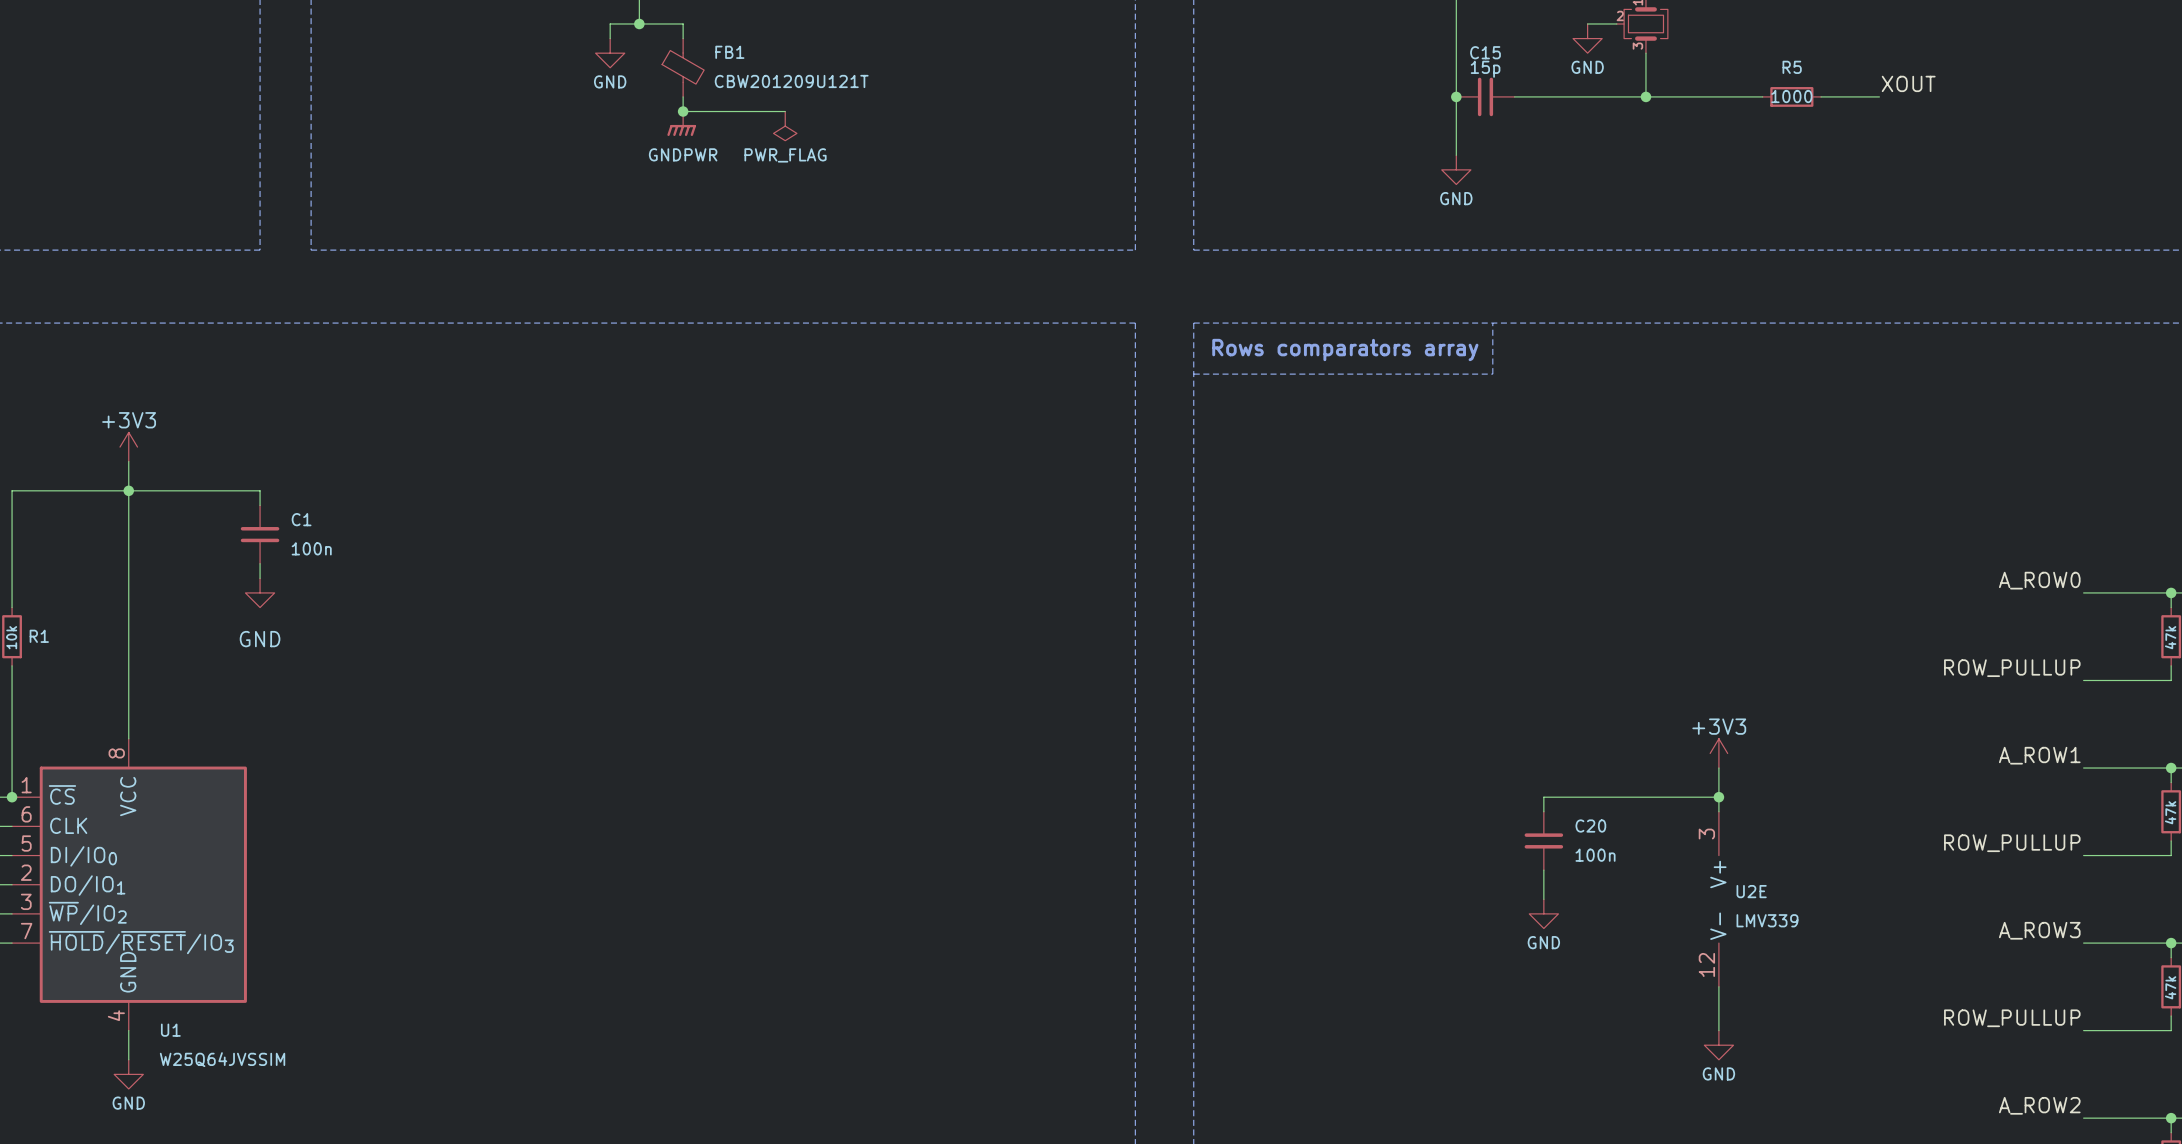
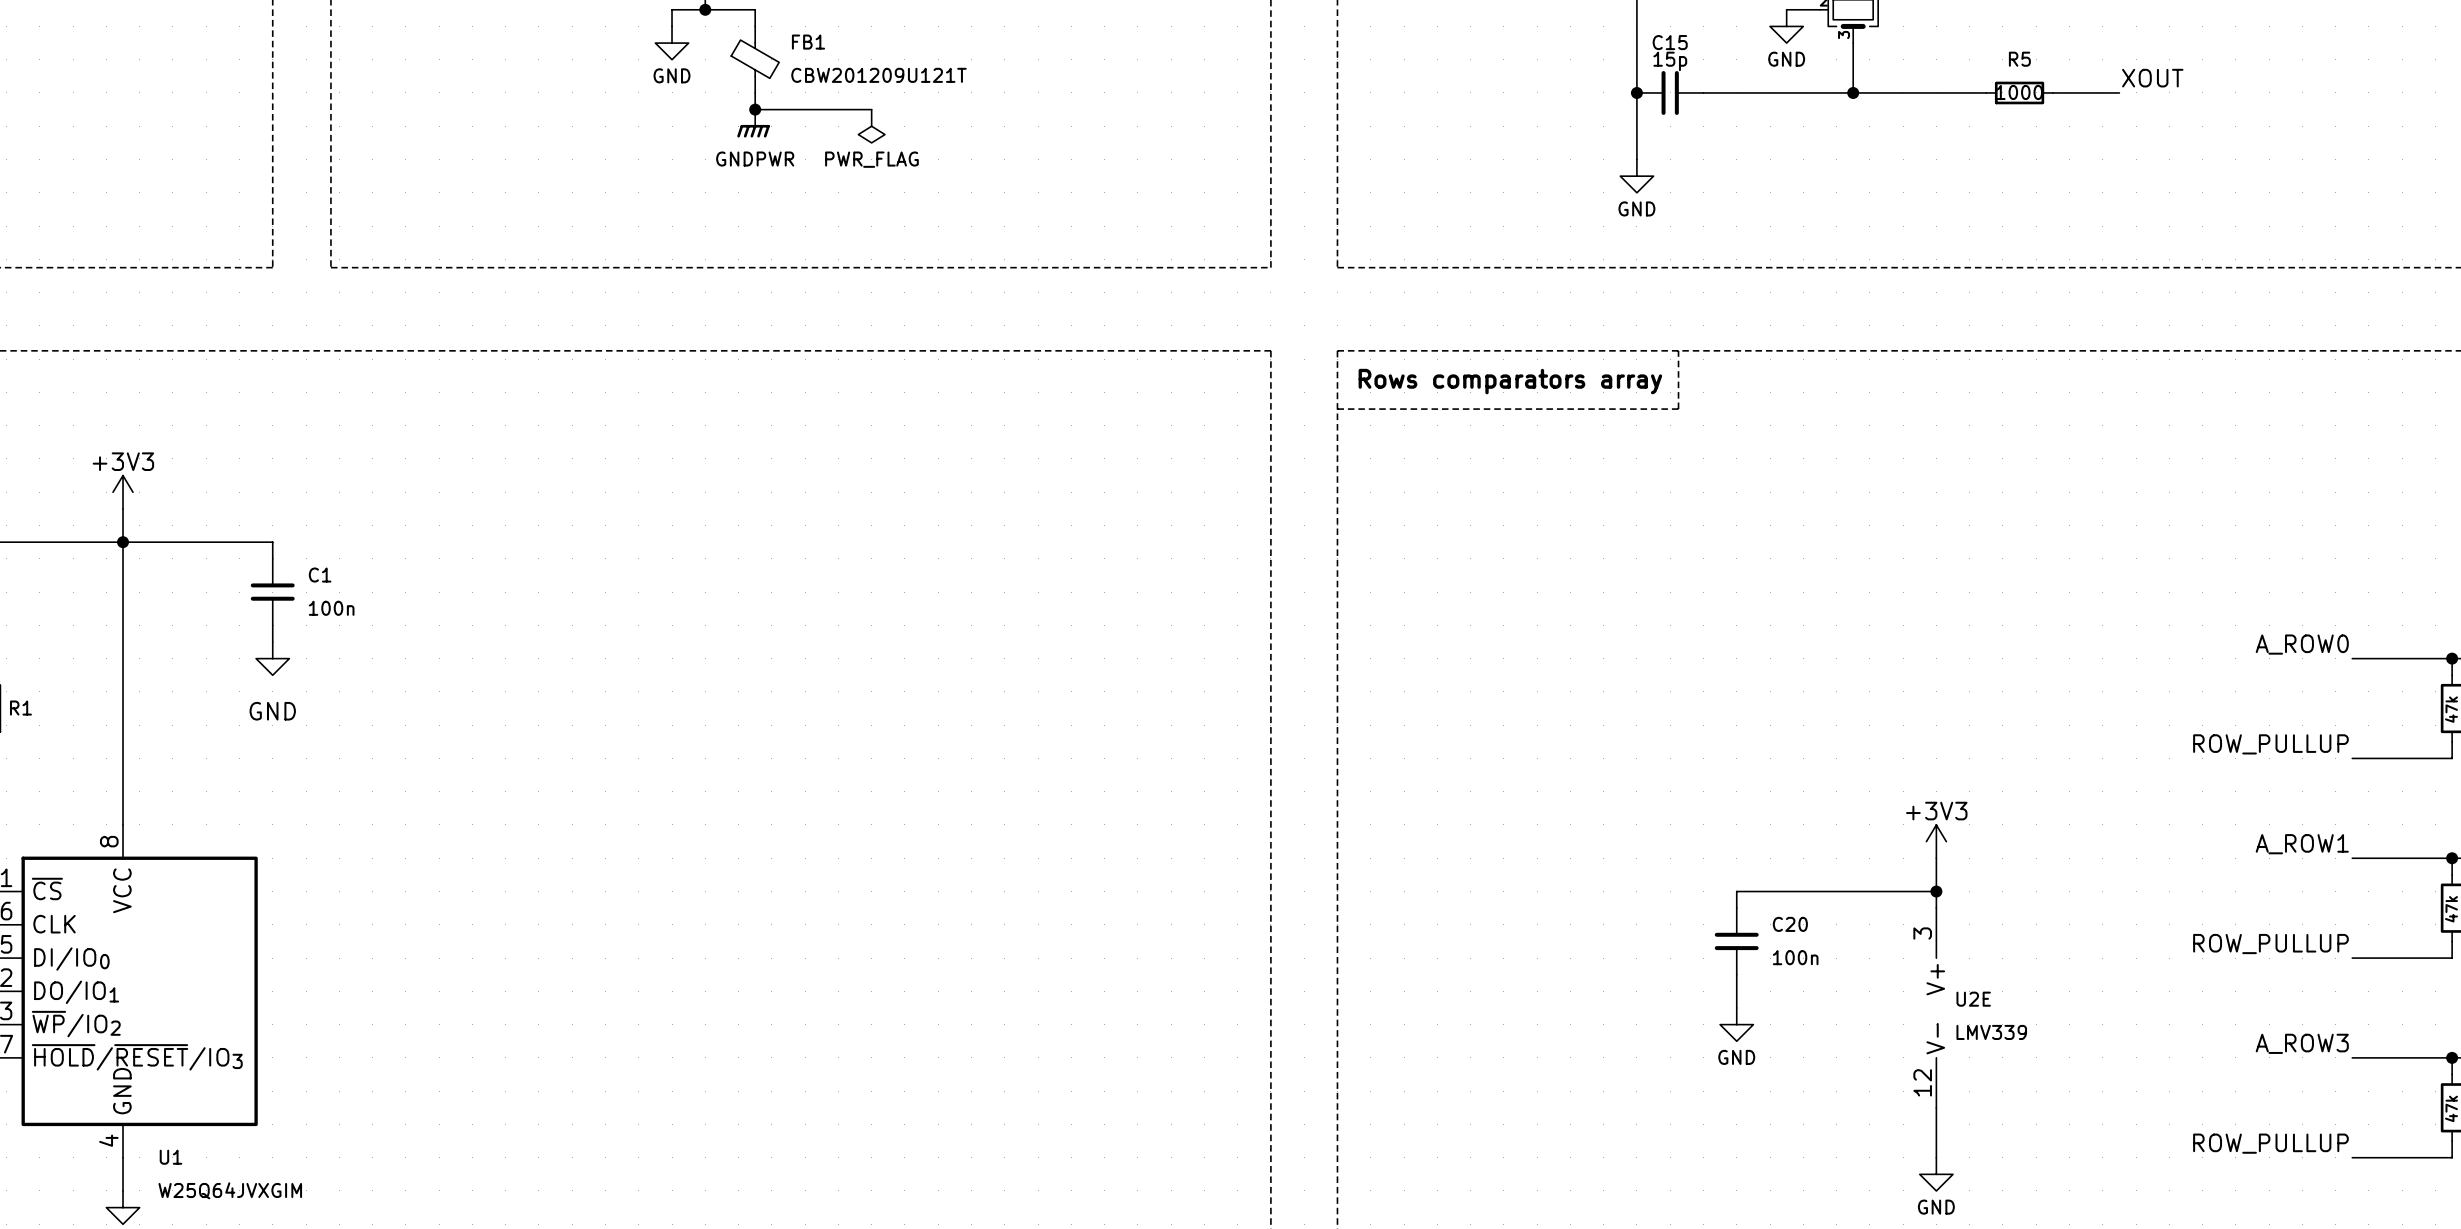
U1 value: W25Q64JVSSIM (222, 1059) -> W25Q64JVXGIM (230, 1190)

